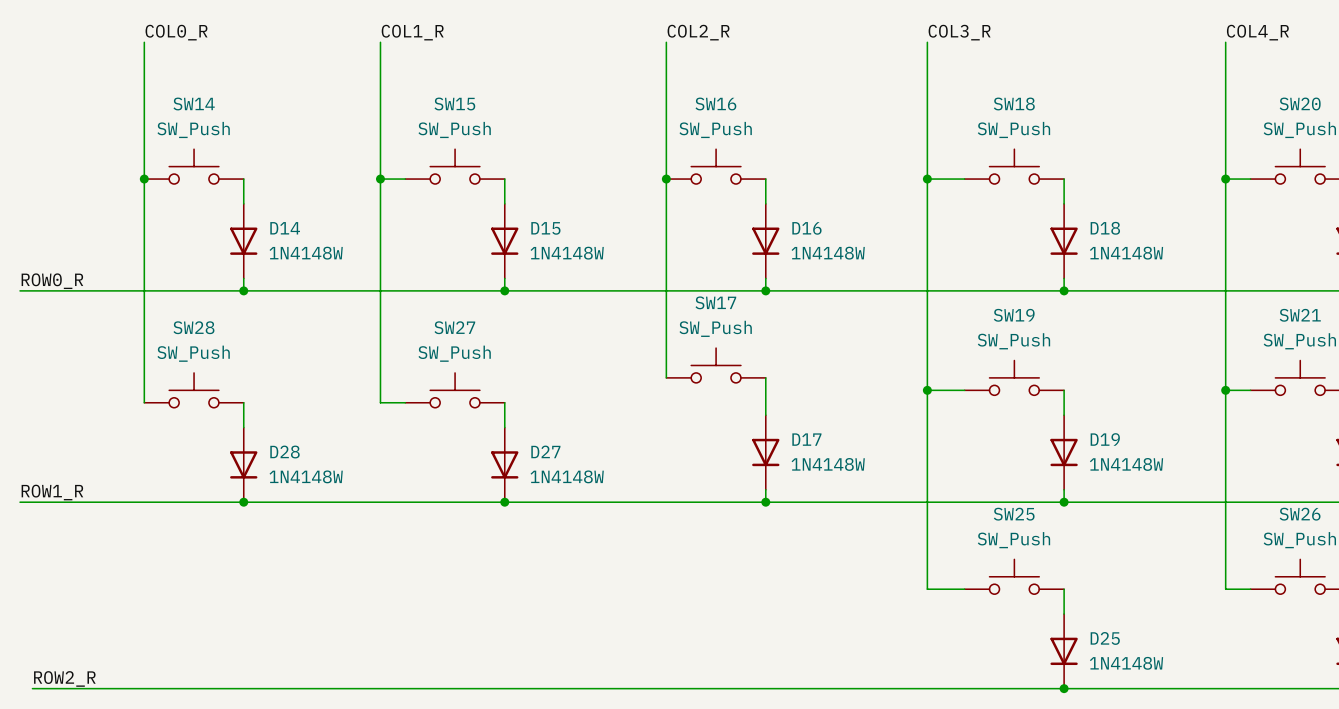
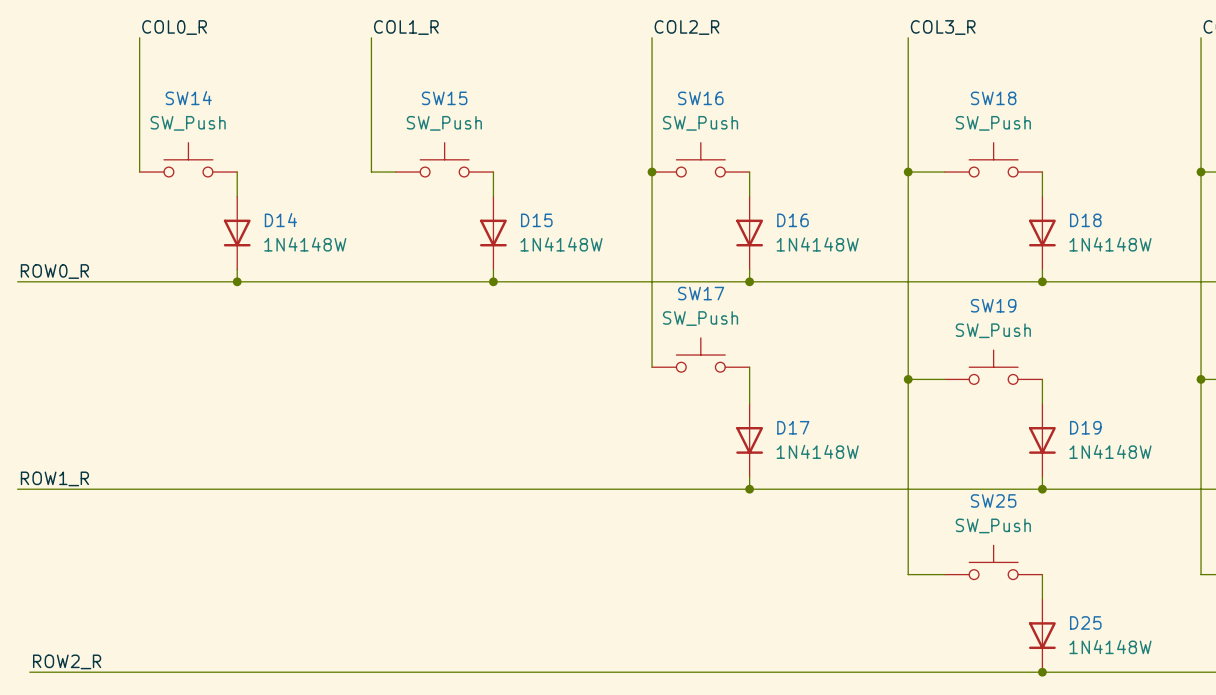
wire: (144, 179) (144, 402) -> none
junction: (144, 179) -> none
wire: (380, 179) (380, 402) (405, 402) -> none
junction: (380, 179) -> none
SW28: SW_Push (194, 390) -> none
SW27: SW_Push (455, 390) -> none
wire: (243, 402) (243, 427) -> none
wire: (504, 402) (504, 427) -> none
D28: 1N4148W (243, 464) -> none
D27: 1N4148W (504, 464) -> none
junction: (243, 502) -> none
junction: (504, 502) -> none

